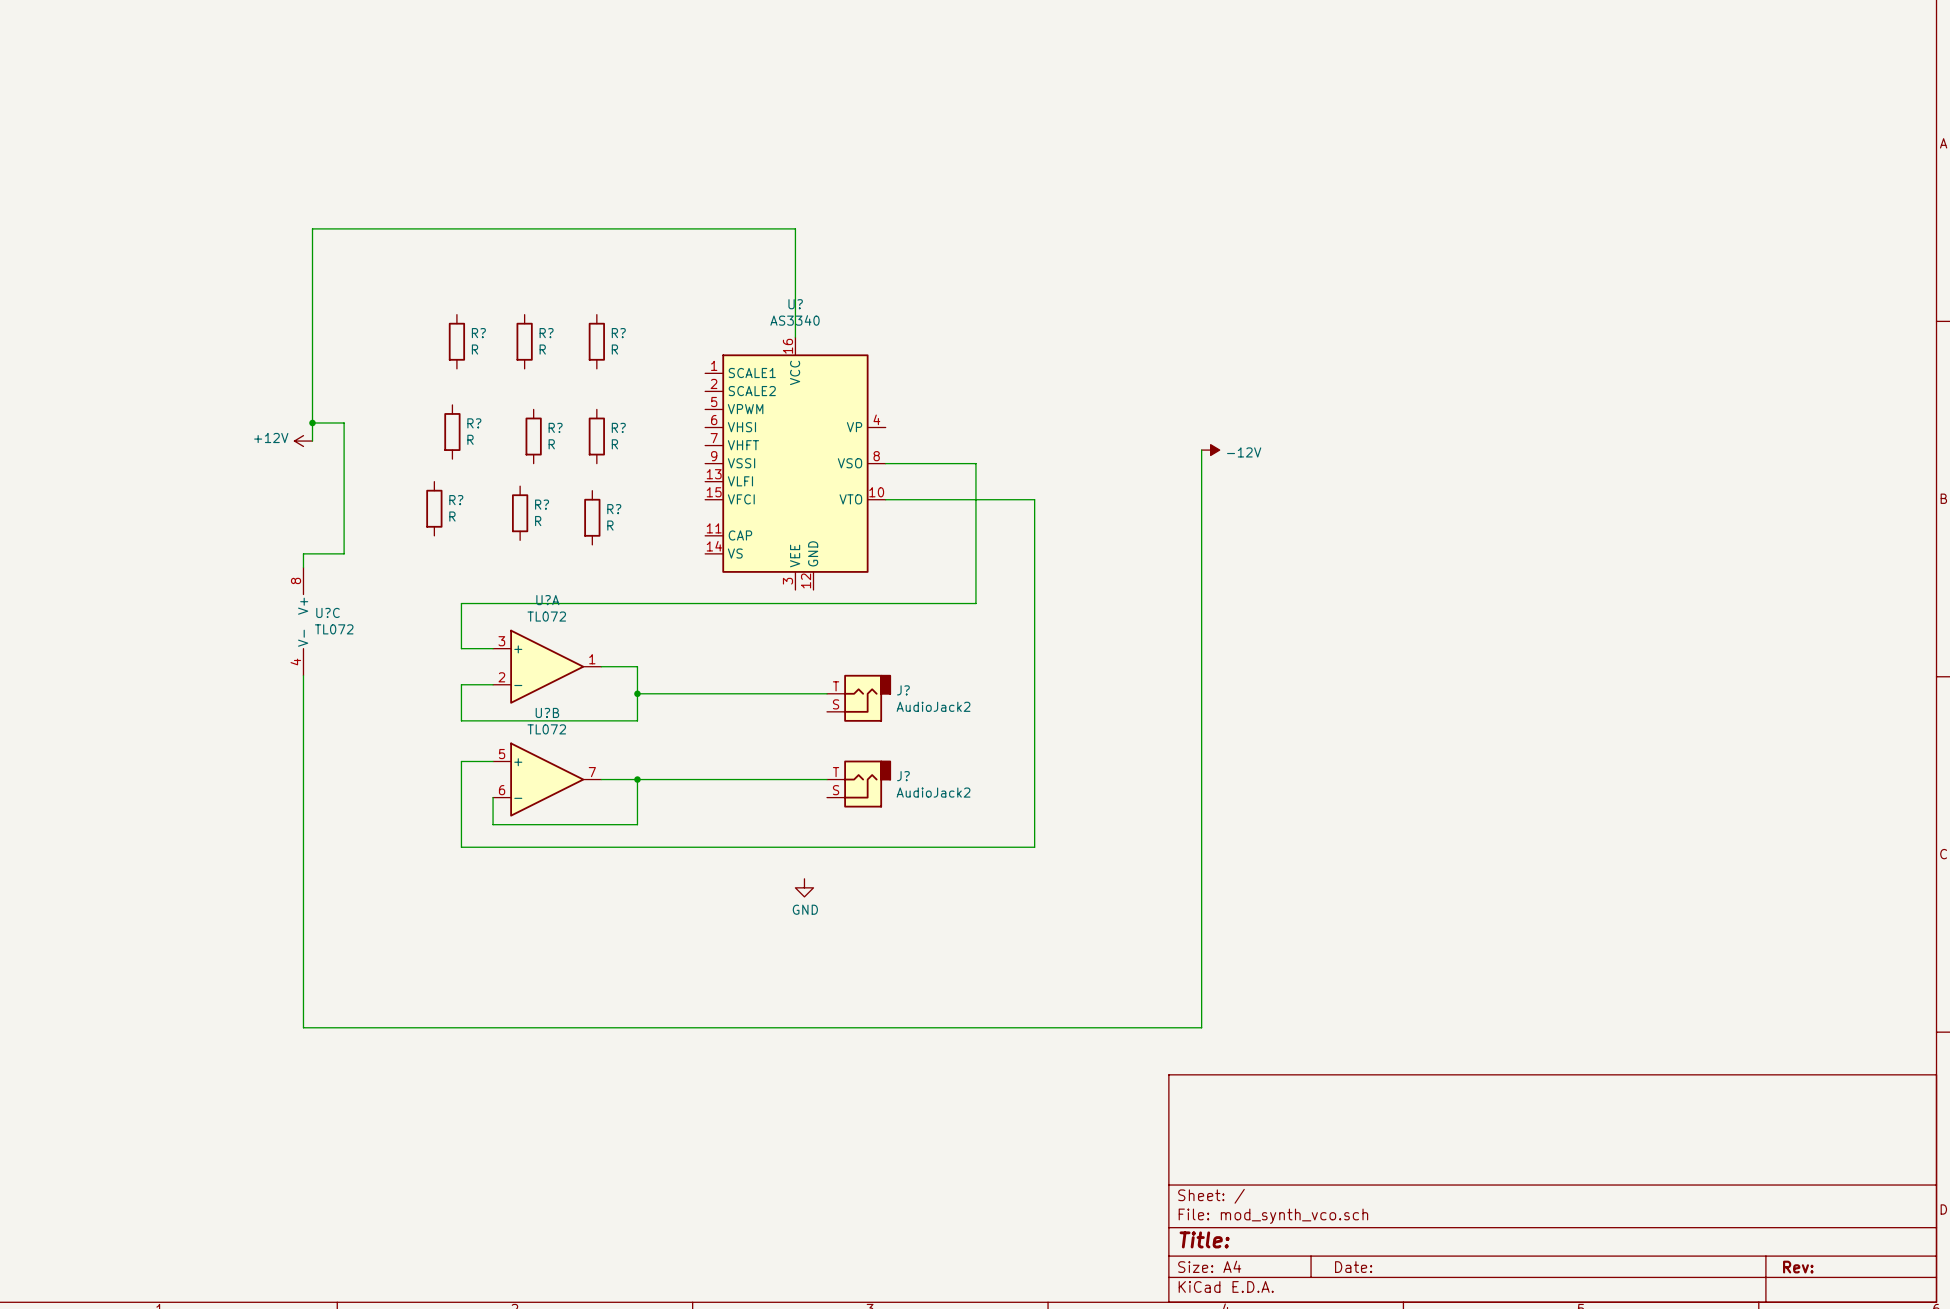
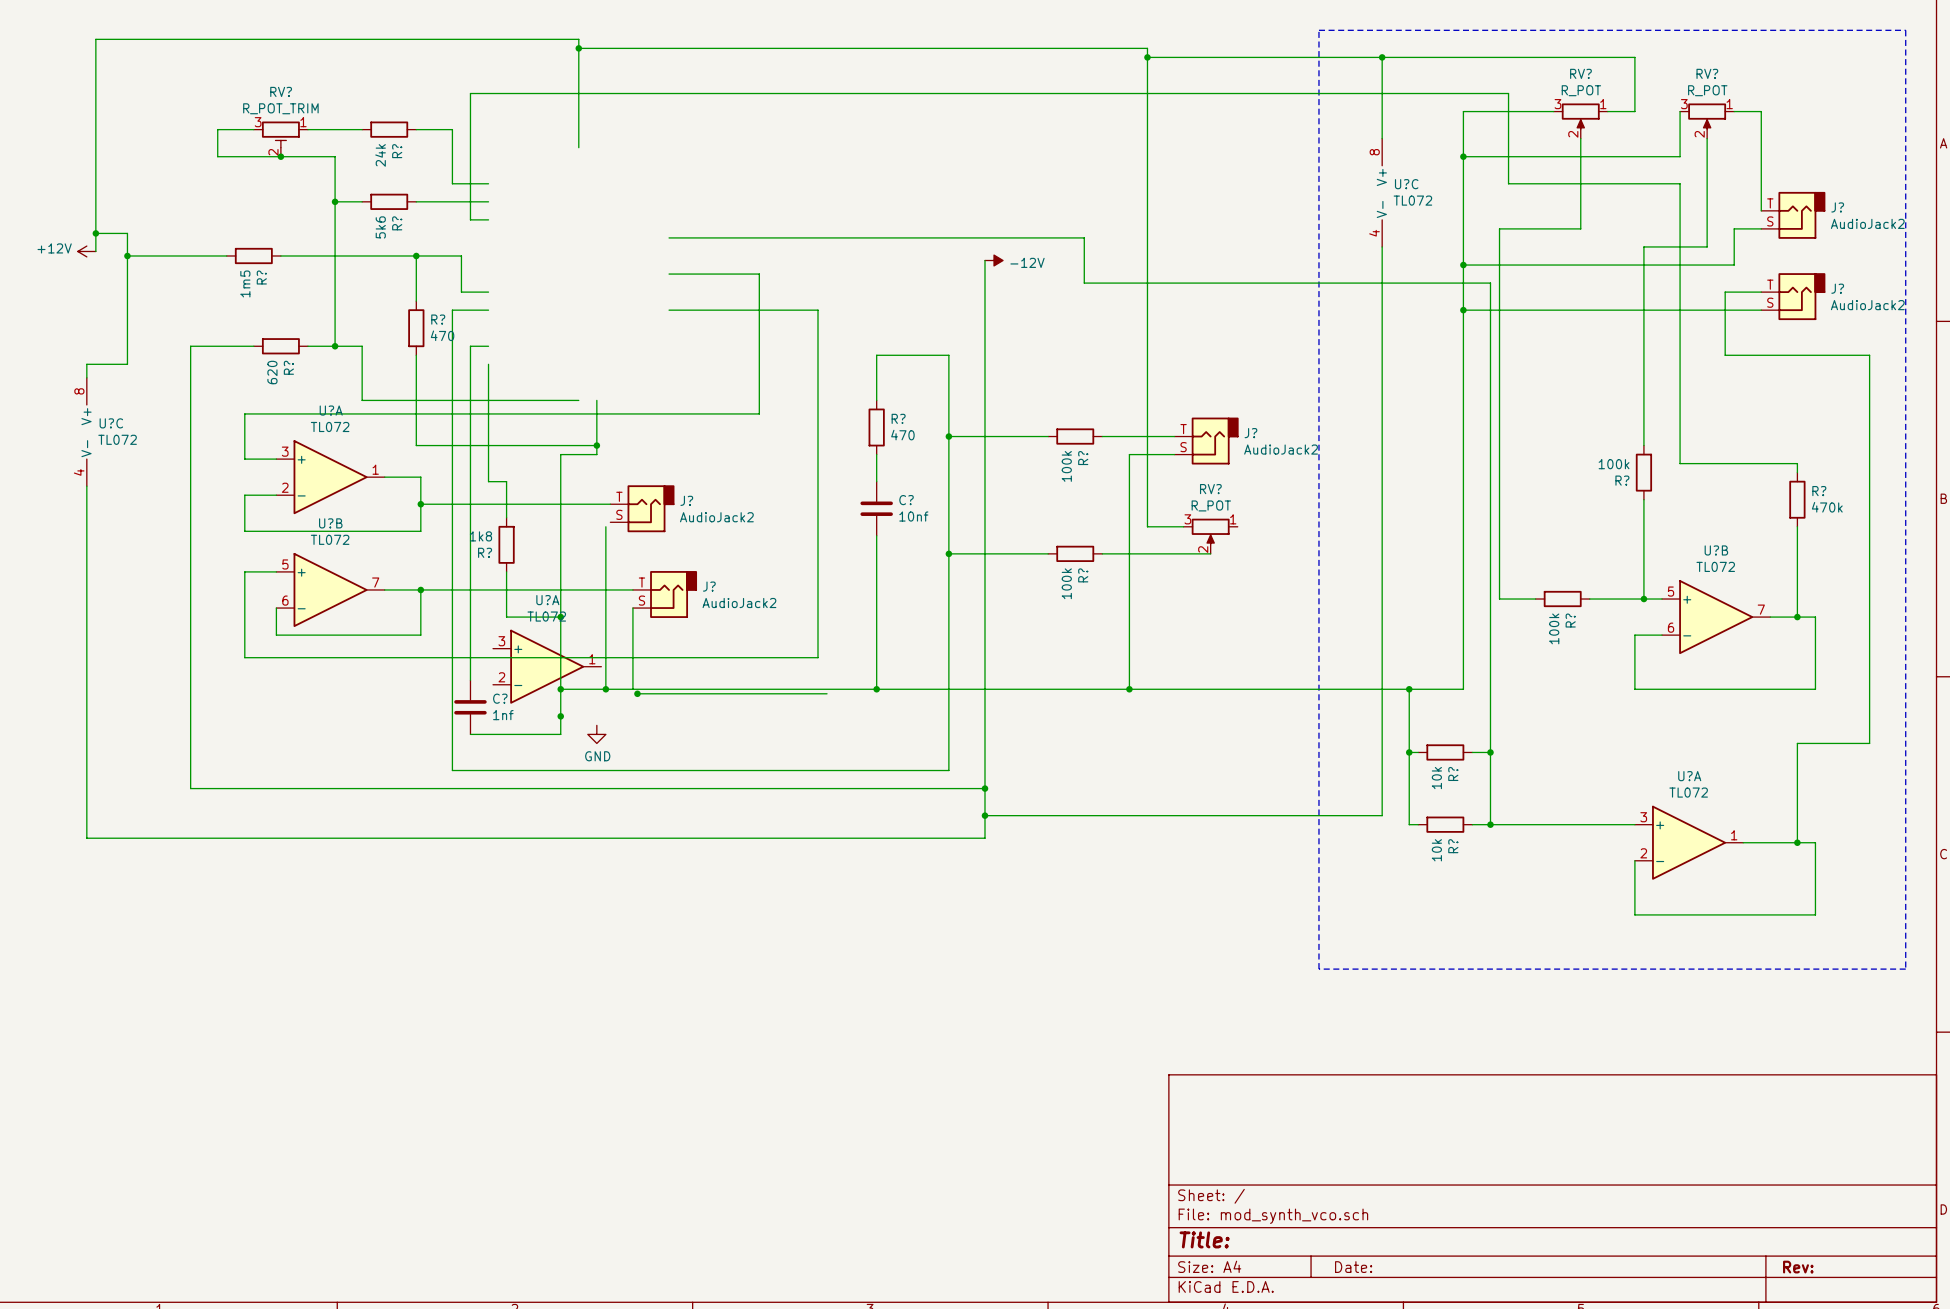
line: none -> (1318, 30) (1318, 969) (1905, 969) (1905, 30) (1318, 30)
wire: none -> (578, 48) (1147, 48) (1147, 526) (1183, 526)
junction: none -> (578, 48)
wire: none -> (1147, 57) (1634, 57) (1634, 111) (1607, 111)
junction: none -> (1147, 57)
wire: none -> (1382, 57) (1382, 138)
junction: none -> (1382, 57)
wire: none -> (1553, 111) (1463, 111) (1463, 689) (560, 689)
wire: none -> (1680, 111) (1680, 156) (1463, 156)
wire: none -> (1734, 111) (1761, 111) (1761, 210)
RV?: none -> R_POT (1580, 121)
RV?: none -> R_POT (1707, 121)
wire: none -> (253, 129) (217, 129) (217, 156) (335, 156) (335, 346)
wire: none -> (307, 129) (362, 129)
R?: none -> 24k (389, 129)
wire: none -> (416, 129) (452, 129) (452, 183) (488, 183)
wire: none -> (1580, 138) (1580, 228) (1499, 228) (1499, 599) (1535, 599)
wire: none -> (1707, 138) (1707, 246) (1643, 246) (1643, 445)
RV?: none -> R_POT_TRIM (280, 139)
wire: none -> (578, 147) (578, 39) (95, 39) (95, 233)
junction: none -> (280, 156)
junction: none -> (1463, 156)
U?C: none -> TL072 (1382, 192)
wire: none -> (335, 201) (362, 201)
junction: none -> (335, 201)
R?: none -> 5k6 (389, 201)
wire: none -> (416, 201) (488, 201)
J?: none -> AudioJack2 (1793, 215)
wire: none -> (488, 219) (470, 219) (470, 93) (1508, 93) (1508, 183) (1680, 183) (1680, 463) (1797, 463) (1797, 472)
wire: none -> (1761, 228) (1734, 228) (1734, 265) (1463, 265)
wire: none -> (95, 233) (127, 233) (127, 364) (86, 364) (86, 377)
wire: none -> (95, 233) (95, 251)
junction: none -> (95, 233)
wire: none -> (669, 237) (1084, 237) (1084, 283) (1490, 283) (1490, 824)
wire: none -> (1382, 246) (1382, 815) (984, 815)
power symbol: none -> +12V (86, 251)
wire: none -> (127, 255) (226, 255)
junction: none -> (127, 255)
R?: none -> 1m5 (253, 255)
wire: none -> (280, 255) (461, 255) (461, 292) (488, 292)
wire: none -> (416, 255) (416, 301)
junction: none -> (416, 255)
wire: none -> (984, 260) (984, 838) (86, 838) (86, 486)
power symbol: none -> -12V (994, 260)
junction: none -> (1463, 265)
wire: none -> (669, 274) (759, 274) (759, 413) (244, 413) (244, 459) (276, 459)
wire: none -> (1761, 292) (1725, 292) (1725, 355) (1869, 355) (1869, 743) (1797, 743) (1797, 842)
J?: none -> AudioJack2 (1793, 296)
wire: none -> (488, 310) (452, 310) (452, 770) (948, 770) (948, 355) (876, 355) (876, 400)
wire: none -> (669, 310) (818, 310) (818, 657) (244, 657) (244, 571) (276, 571)
wire: none -> (1463, 310) (1761, 310)
junction: none -> (1463, 310)
R?: none -> 470 (416, 328)
wire: (795, 337) (795, 228) (312, 228) (312, 422) -> none
R?: R (456, 341) -> none
R?: R (524, 341) -> none
R?: R (596, 341) -> none
wire: none -> (253, 346) (190, 346) (190, 788) (984, 788)
R?: none -> 620 (280, 346)
wire: none -> (307, 346) (362, 346) (362, 400) (578, 400)
junction: none -> (335, 346)
wire: none -> (488, 346) (470, 346) (470, 680)
wire: none -> (416, 355) (416, 445) (596, 445)
wire: none -> (488, 364) (488, 481) (506, 481) (506, 517)
wire: none -> (596, 400) (596, 454) (560, 454) (560, 734) (470, 734)
wire: (312, 422) (344, 422) (344, 553) (303, 553) (303, 567) -> none
wire: (312, 422) (312, 441) -> none
junction: (312, 422) -> none
R?: none -> 470 (876, 427)
U?C: none -> TL072 (86, 432)
R?: R (452, 432) -> none
R?: R (533, 436) -> none
R?: R (596, 436) -> none
wire: none -> (948, 436) (1048, 436)
junction: none -> (948, 436)
R?: none -> 100k (1075, 436)
wire: none -> (1102, 436) (1174, 436)
power symbol: +12V (303, 441) -> none
J?: none -> AudioJack2 (1206, 441)
junction: none -> (596, 445)
wire: (1201, 450) (1201, 1027) (303, 1027) (303, 675) -> none
power symbol: -12V (1210, 450) -> none
wire: none -> (876, 454) (876, 481)
wire: none -> (1174, 454) (1129, 454) (1129, 689)
U?: AS3340 (795, 463) -> none
wire: (885, 463) (975, 463) (975, 603) (461, 603) (461, 648) (493, 648) -> none
R?: none -> 100k (1643, 472)
U?A: none -> TL072 (330, 477)
wire: none -> (384, 477) (420, 477) (420, 531) (244, 531) (244, 495) (276, 495)
wire: (885, 499) (1034, 499) (1034, 847) (461, 847) (461, 761) (493, 761) -> none
wire: none -> (1643, 499) (1643, 599)
R?: none -> 470k (1797, 499)
wire: none -> (420, 504) (610, 504)
junction: none -> (420, 504)
R?: R (434, 508) -> none
J?: none -> AudioJack2 (642, 508)
C?: none -> 10nf (876, 508)
R?: R (520, 513) -> none
R?: R (592, 517) -> none
wire: none -> (605, 526) (605, 689)
wire: none -> (1797, 526) (1797, 617)
wire: none -> (876, 535) (876, 689)
RV?: none -> R_POT (1210, 536)
R?: none -> 1k8 (506, 544)
wire: none -> (948, 553) (1048, 553)
junction: none -> (948, 553)
R?: none -> 100k (1075, 553)
wire: none -> (1102, 553) (1210, 553)
wire: none -> (506, 571) (506, 617) (560, 617)
U?B: none -> TL072 (330, 589)
wire: none -> (384, 589) (632, 589)
wire: none -> (420, 589) (420, 635) (276, 635) (276, 608)
junction: none -> (420, 589)
J?: none -> AudioJack2 (664, 594)
R?: none -> 100k (1562, 599)
wire: none -> (1589, 599) (1661, 599)
junction: none -> (1643, 599)
wire: none -> (632, 608) (632, 689)
junction: none -> (560, 617)
U?B: none -> TL072 (1716, 617)
wire: none -> (1770, 617) (1815, 617) (1815, 689) (1634, 689) (1634, 635) (1661, 635)
junction: none -> (1797, 617)
U?C: TL072 (303, 621) -> none
wire: (601, 666) (637, 666) (637, 720) (461, 720) (461, 684) (493, 684) -> none
junction: none -> (560, 689)
junction: none -> (605, 689)
junction: none -> (876, 689)
junction: none -> (1129, 689)
wire: none -> (1409, 689) (1409, 824) (1418, 824)
junction: none -> (1409, 689)
J?: AudioJack2 (859, 698) -> none
C?: none -> 1nf (470, 707)
junction: none -> (560, 716)
power symbol: none -> GND (596, 734)
wire: none -> (1409, 752) (1418, 752)
junction: none -> (1409, 752)
R?: none -> 10k (1445, 752)
wire: none -> (1472, 752) (1490, 752)
junction: none -> (1490, 752)
U?B: TL072 (547, 779) -> none
wire: (601, 779) (827, 779) -> none
wire: (637, 779) (637, 824) (493, 824) (493, 797) -> none
junction: (637, 779) -> none
J?: AudioJack2 (859, 784) -> none
junction: none -> (984, 788)
junction: none -> (984, 815)
R?: none -> 10k (1445, 824)
wire: none -> (1472, 824) (1634, 824)
junction: none -> (1490, 824)
U?A: none -> TL072 (1689, 842)
wire: none -> (1743, 842) (1815, 842) (1815, 914) (1634, 914) (1634, 860)
junction: none -> (1797, 842)
power symbol: GND (804, 887) -> none

